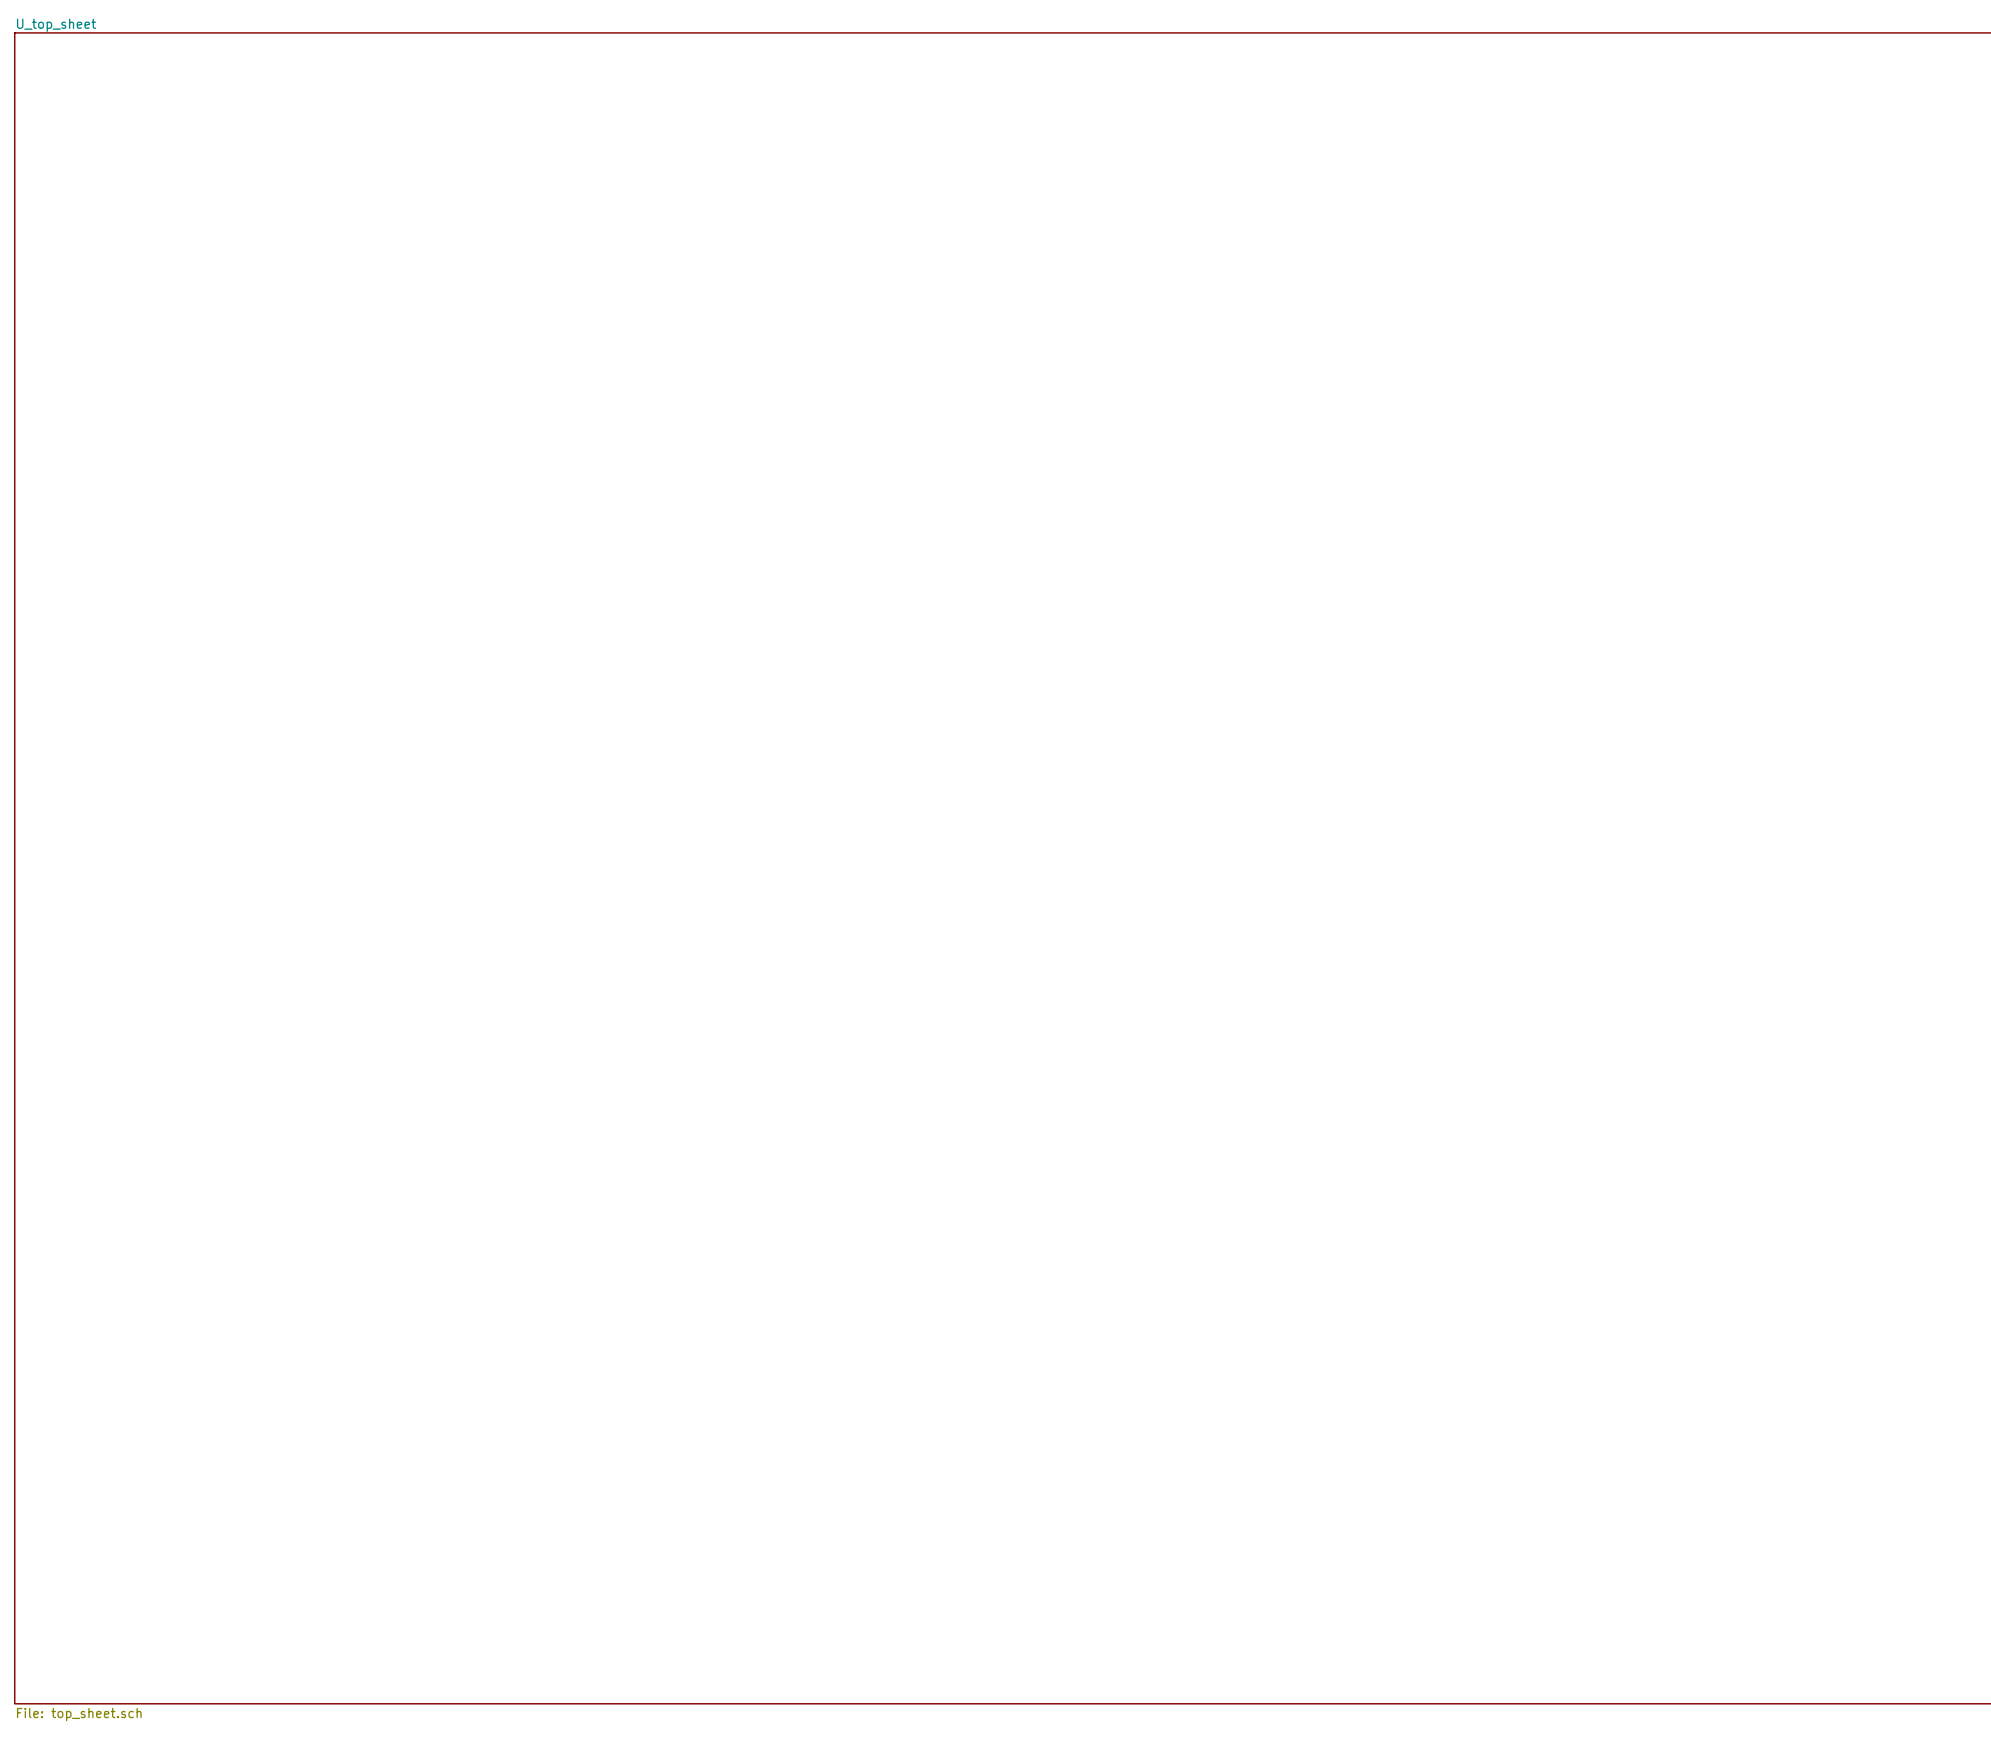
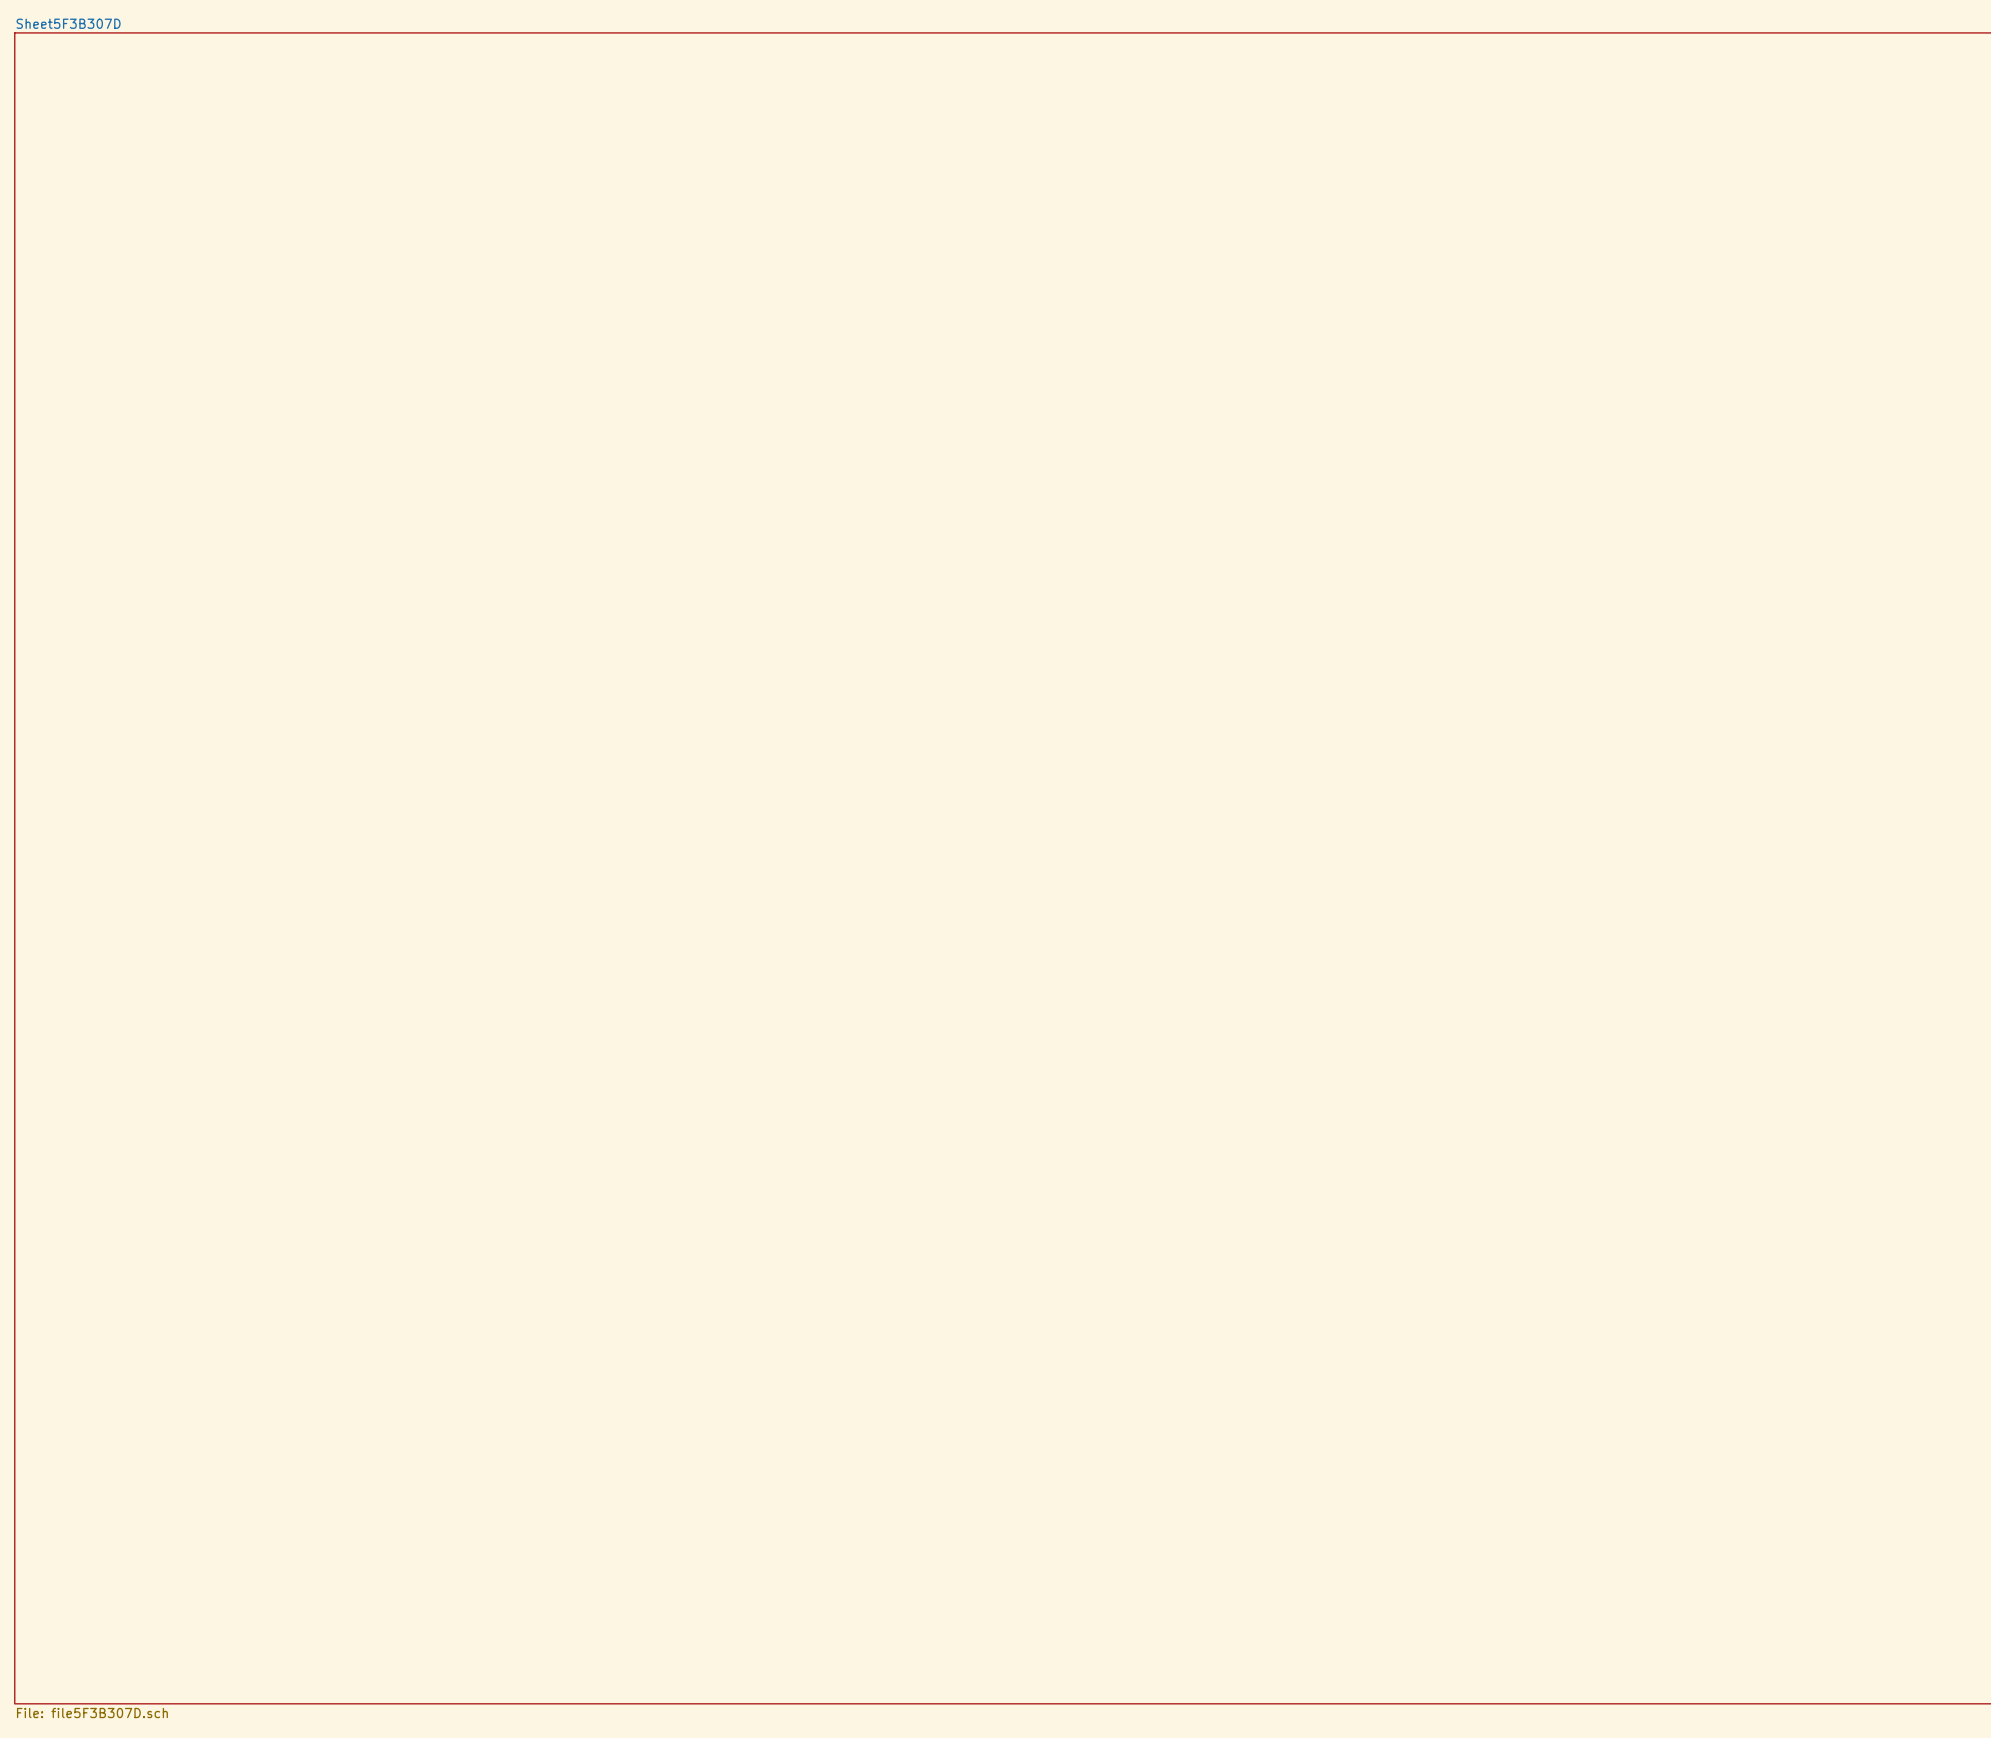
sheet U_top_sheet name: U_top_sheet (56, 25) -> Sheet5F3B307D (68, 23)
sheet U_top_sheet value: File: top_sheet.sch (79, 1714) -> File: file5F3B307D.sch (92, 1713)

